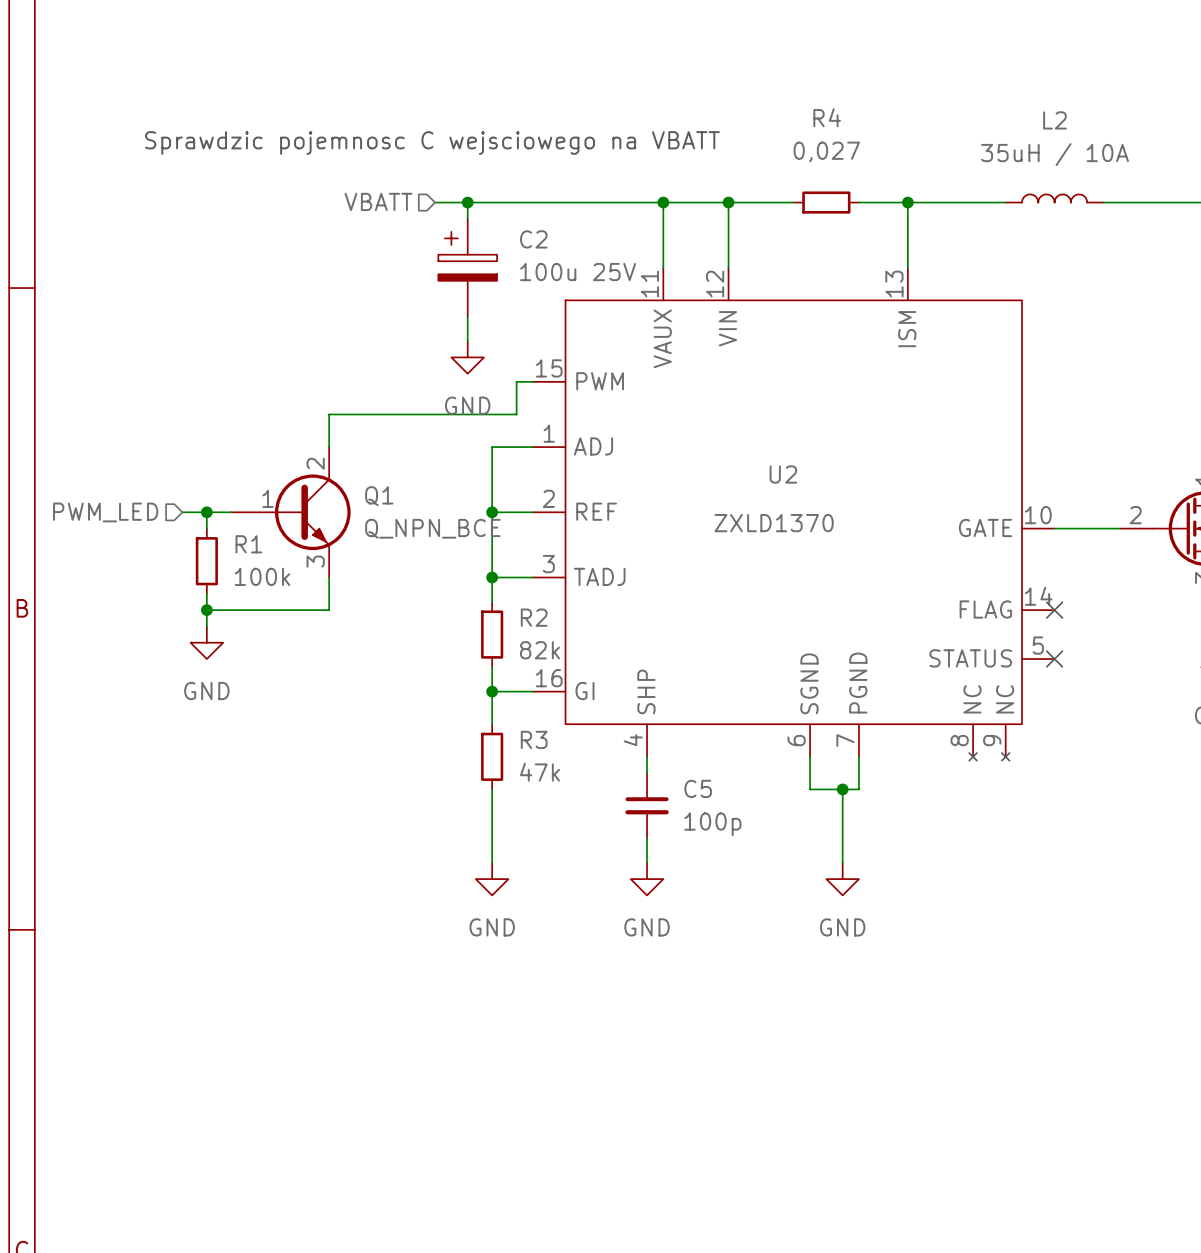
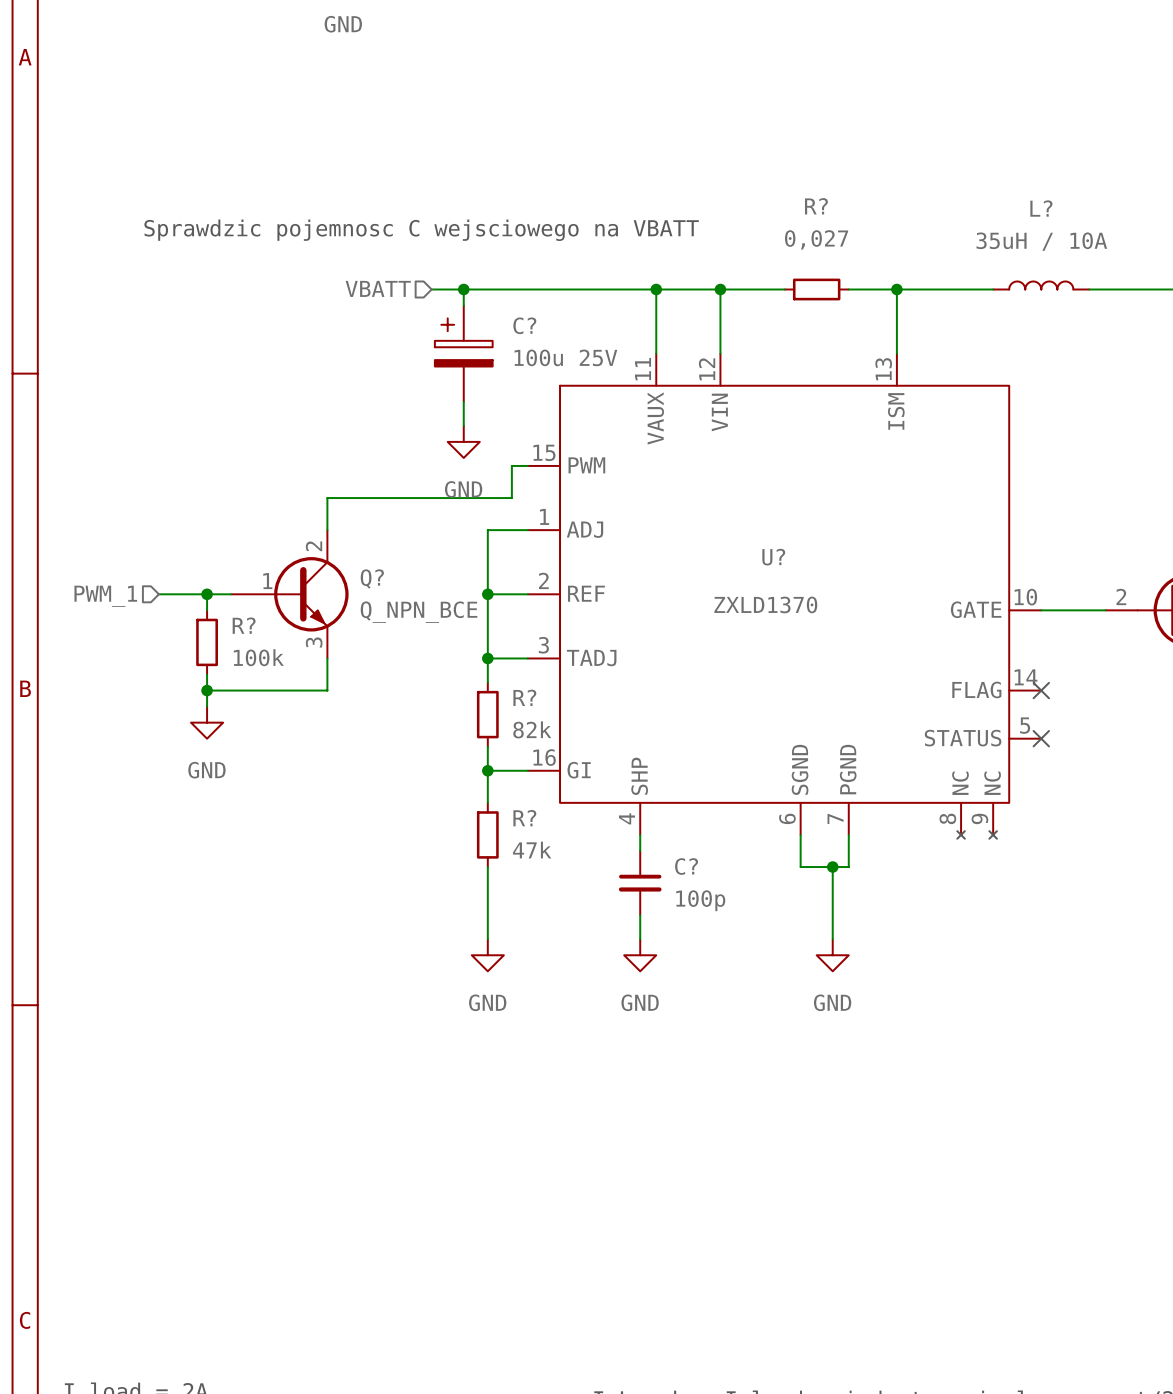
R4 name: R4 (827, 117) -> R? (816, 206)
L2: 35uH / 10A (1054, 198) -> none
L?: none -> 35uH / 10A (1041, 285)
C2 name: C2 (533, 239) -> C? (524, 325)
U2 name: U2 (783, 474) -> U? (773, 557)
Q1 name: Q1 (379, 496) -> Q? (372, 578)
hierarchical label: PWM_LED (105, 512) -> PWM_1 (105, 596)
wire: none -> (158, 594) (183, 594)
R1 name: R1 (248, 544) -> R? (244, 625)
R2 name: R2 (534, 617) -> R? (524, 697)
R3 name: R3 (534, 739) -> R? (524, 818)
C5 name: C5 (698, 788) -> C? (686, 866)

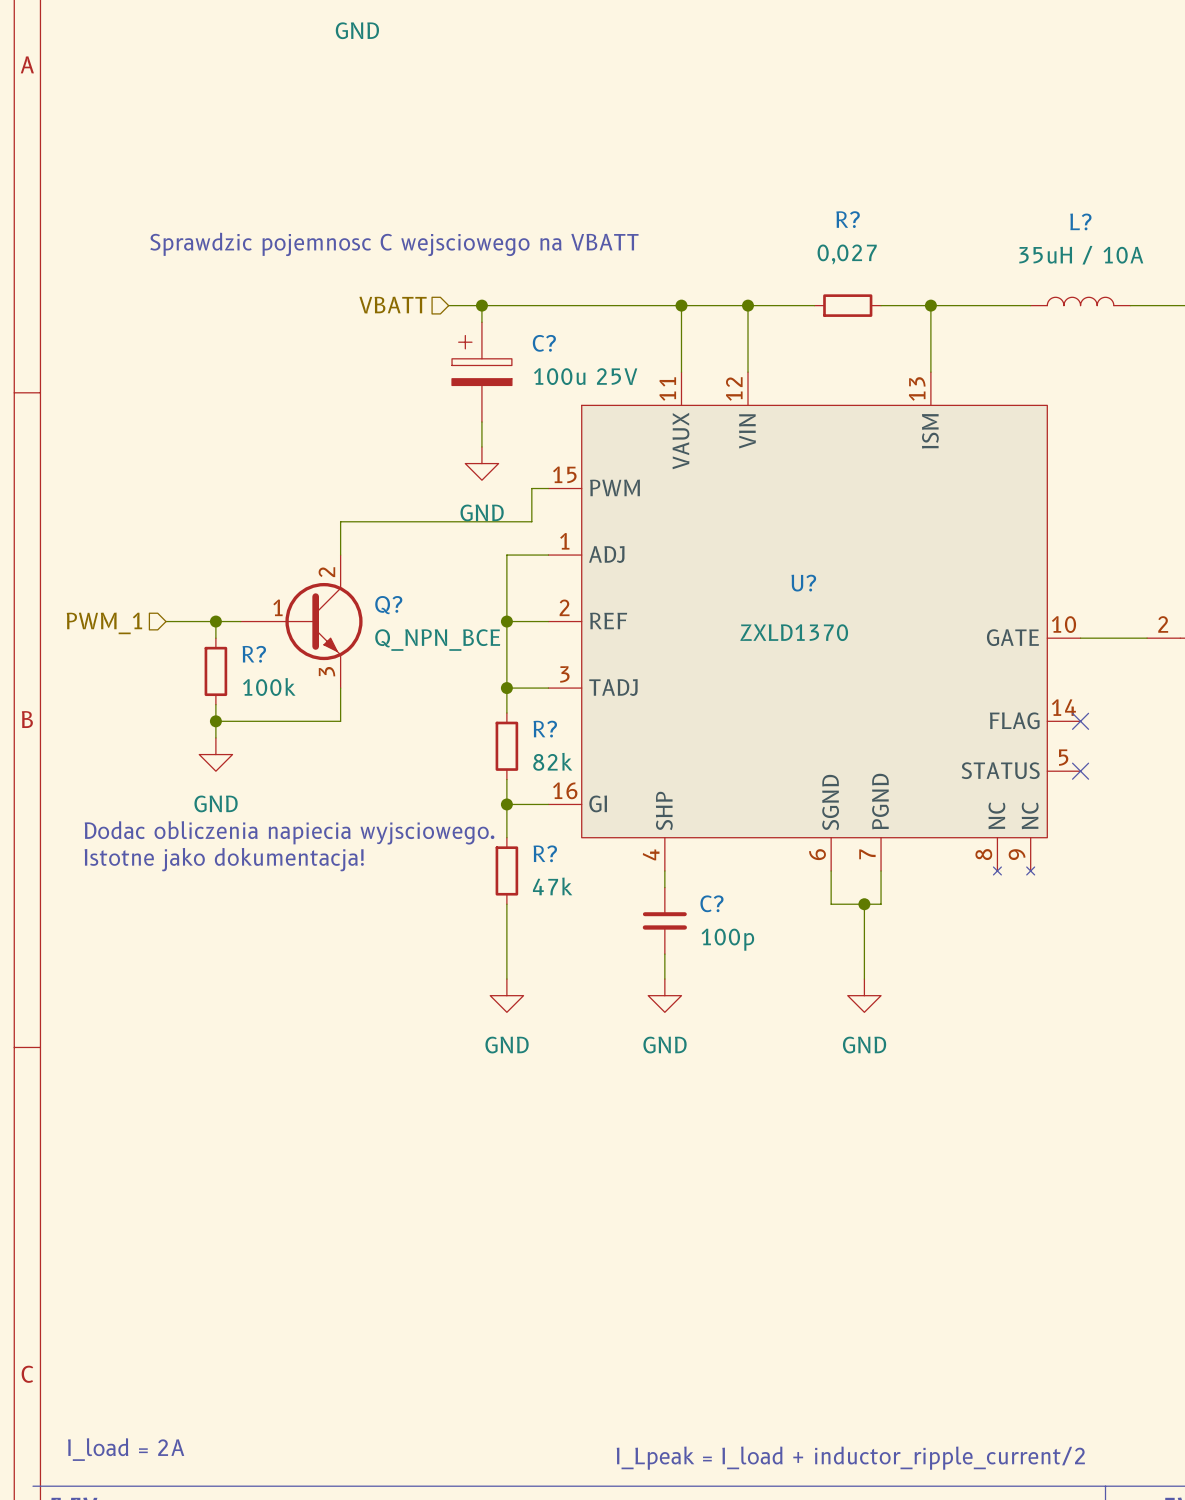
text: none -> Dodac obliczenia napiecia wyjsciowego. (289, 832)
text: none -> Istotne jako dokumentacja! (224, 859)

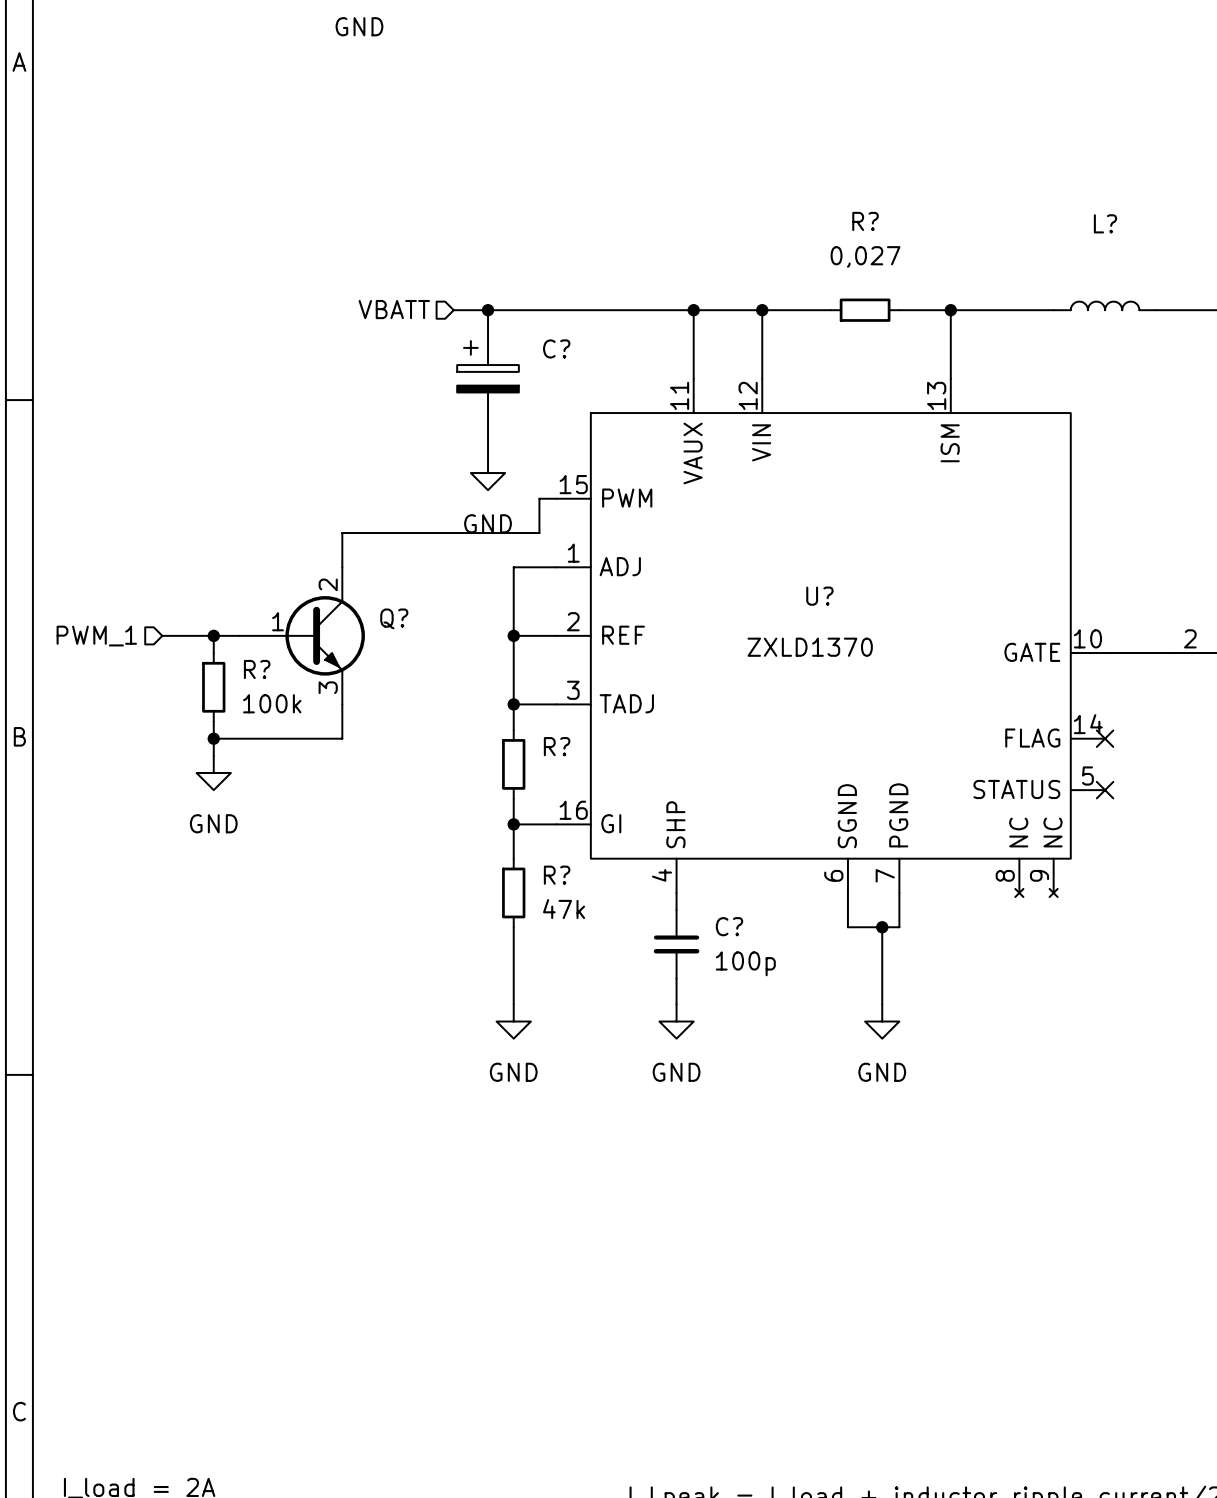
text: Sprawdzic pojemnosc C wejsciowego na VBATT (394, 244) -> none
L? value: 35uH / 10A (1081, 255) -> none
C? value: 100u 25V (585, 376) -> none
Q? value: Q_NPN_BCE (437, 640) -> none
R? value: 82k (552, 761) -> none
text: Dodac obliczenia napiecia wyjsciowego. (289, 832) -> none
text: Istotne jako dokumentacja! (224, 859) -> none

